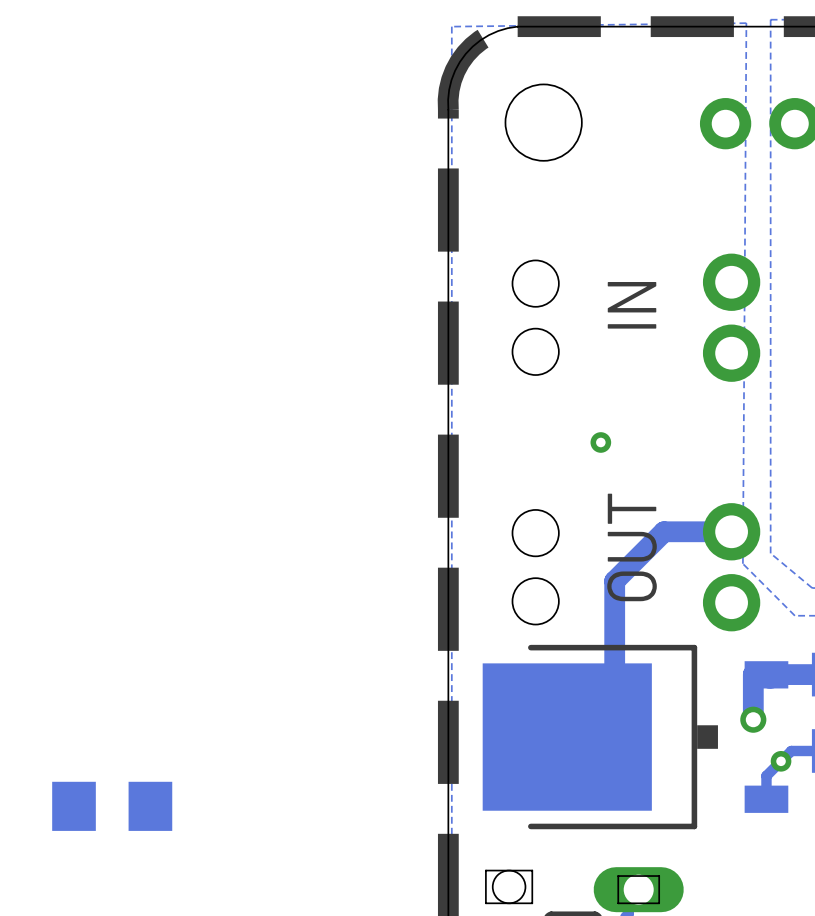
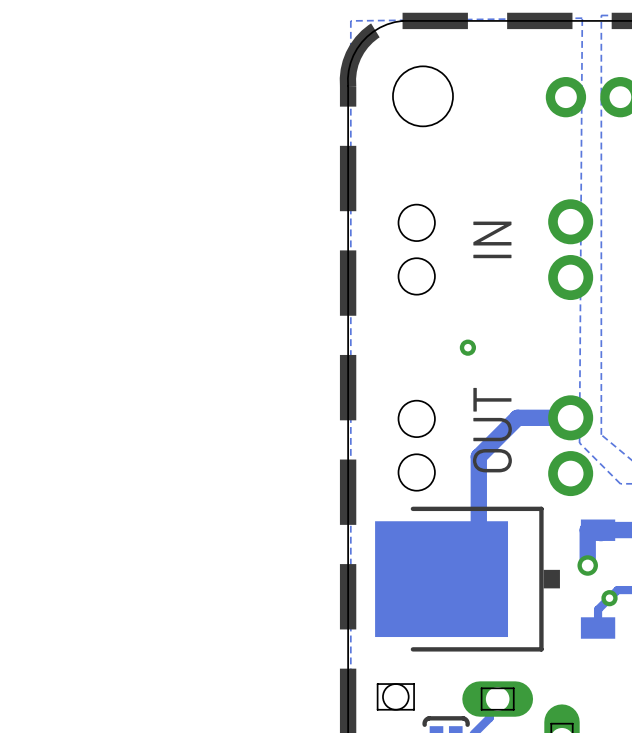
part: (112, 806) -> none

